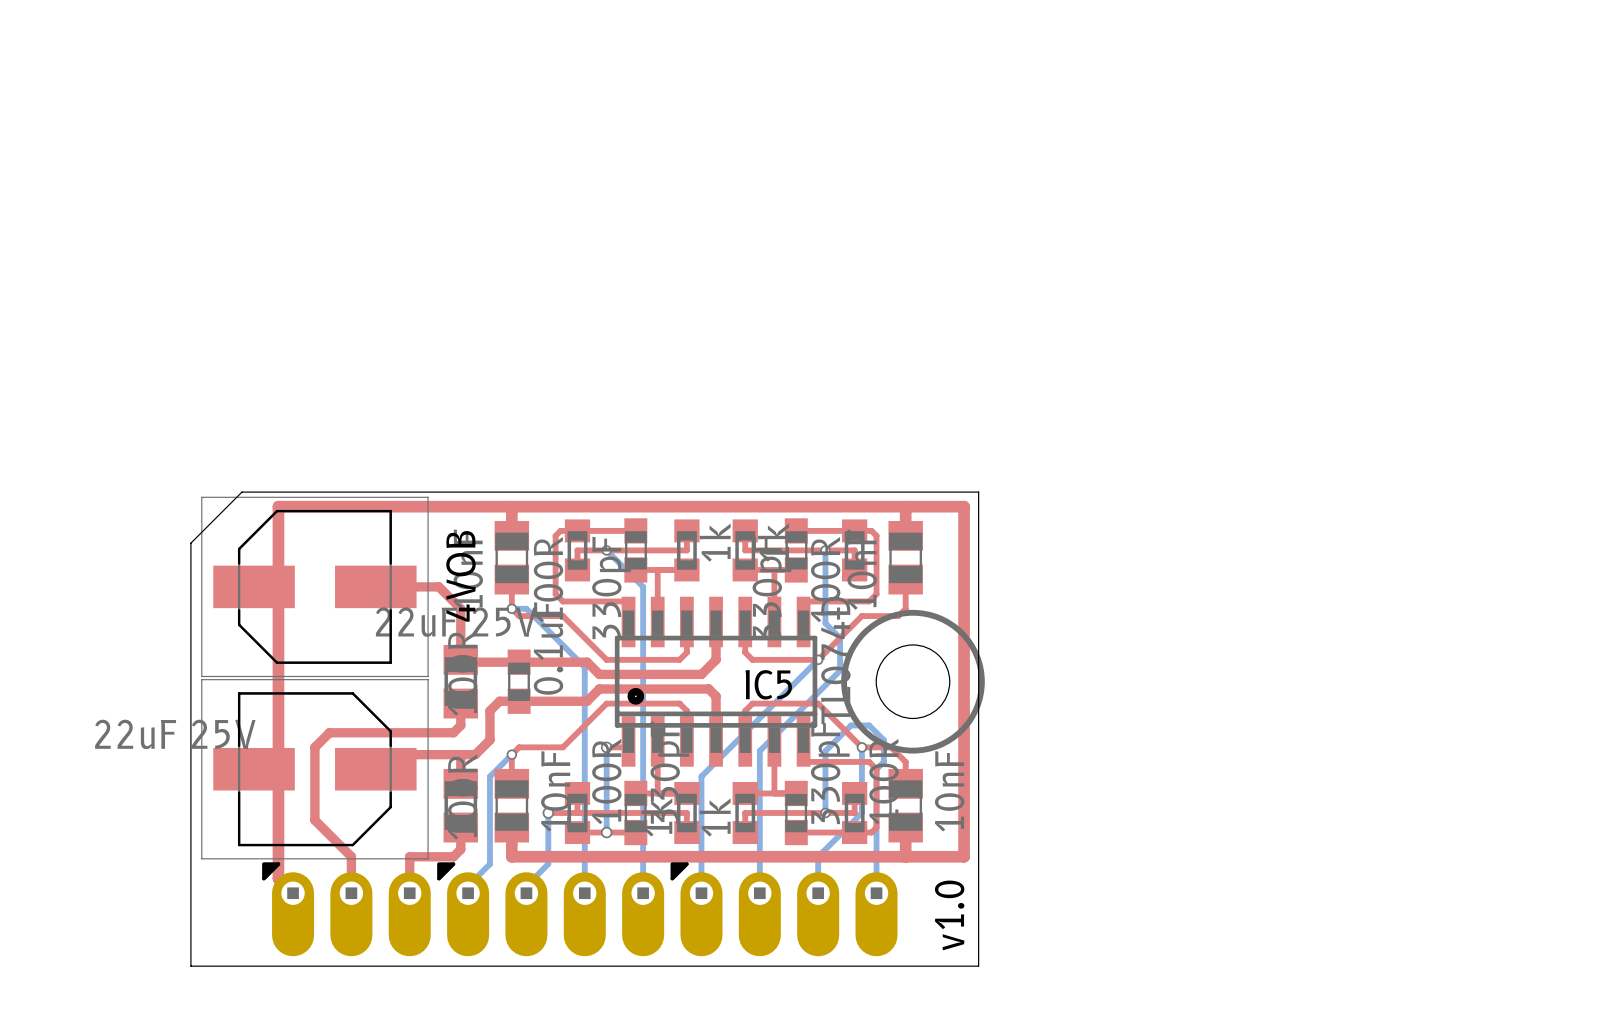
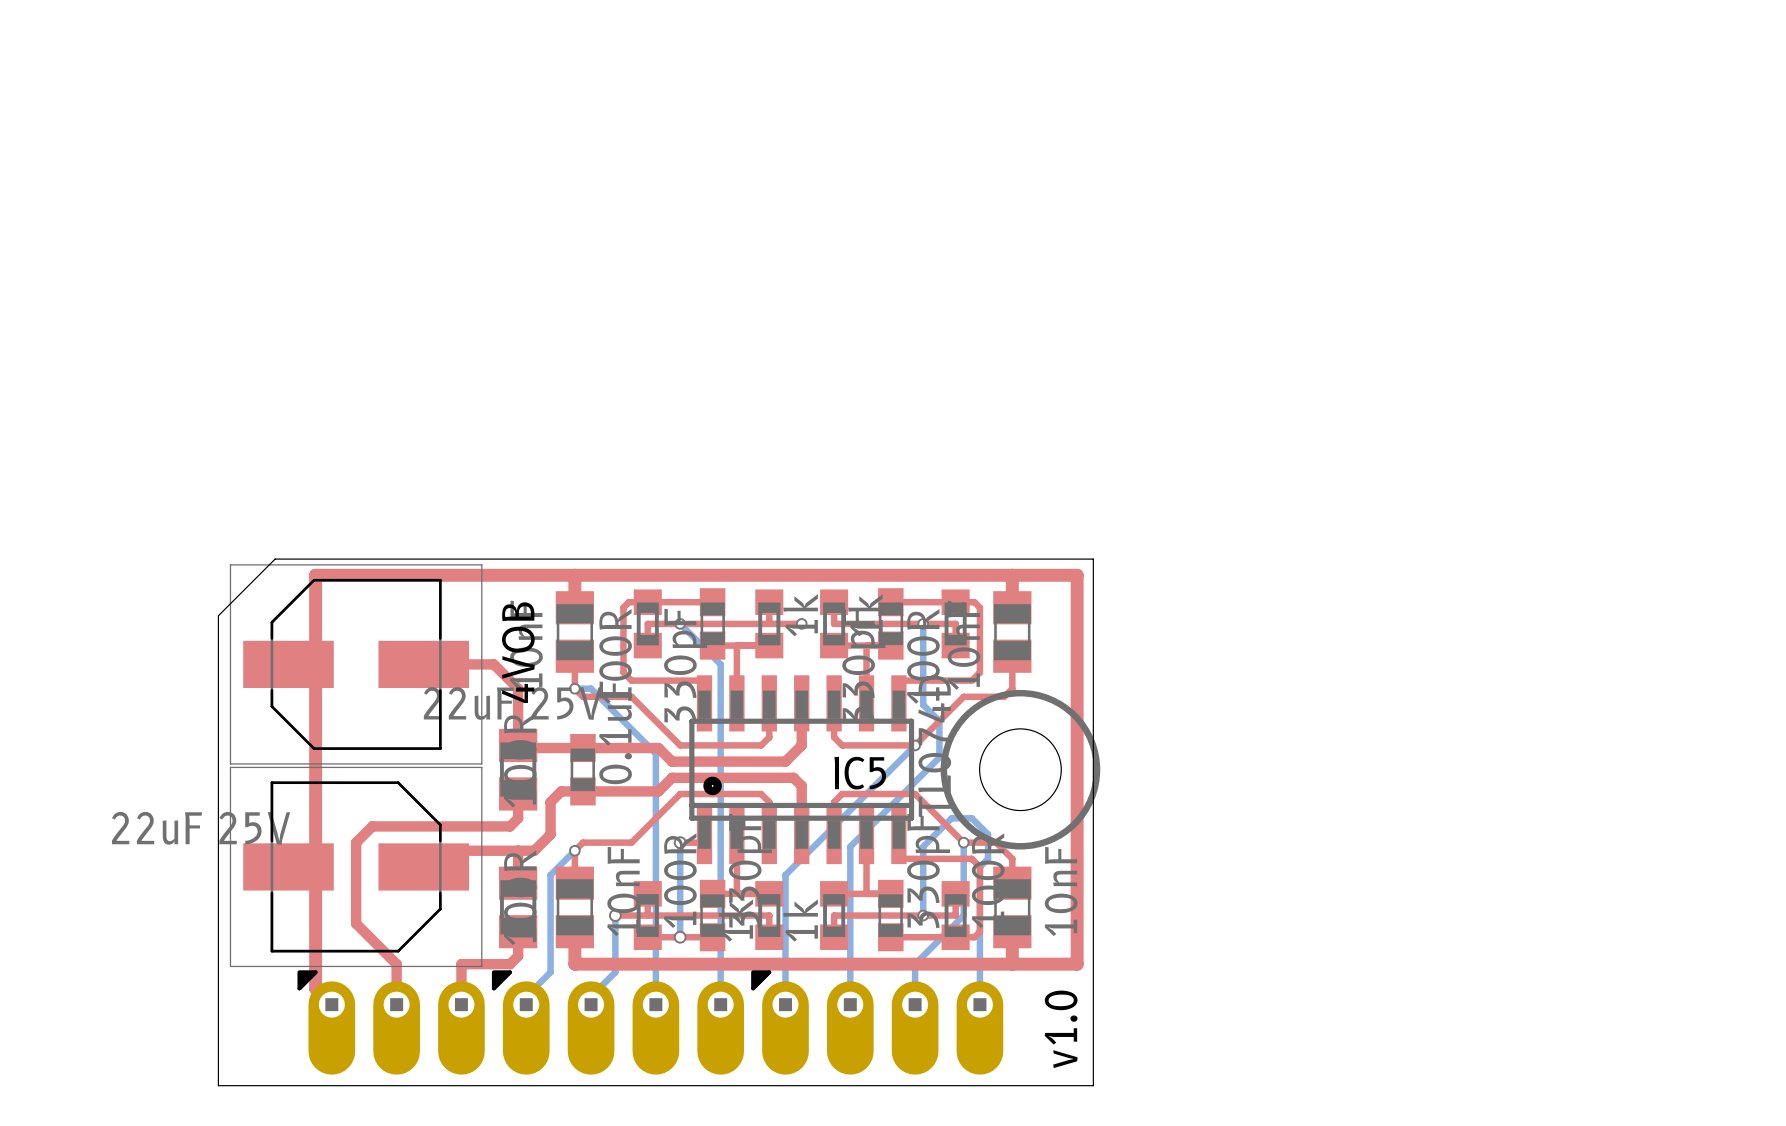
top track: none -> (769, 623) (801, 623)
via: none -> (801, 623)

